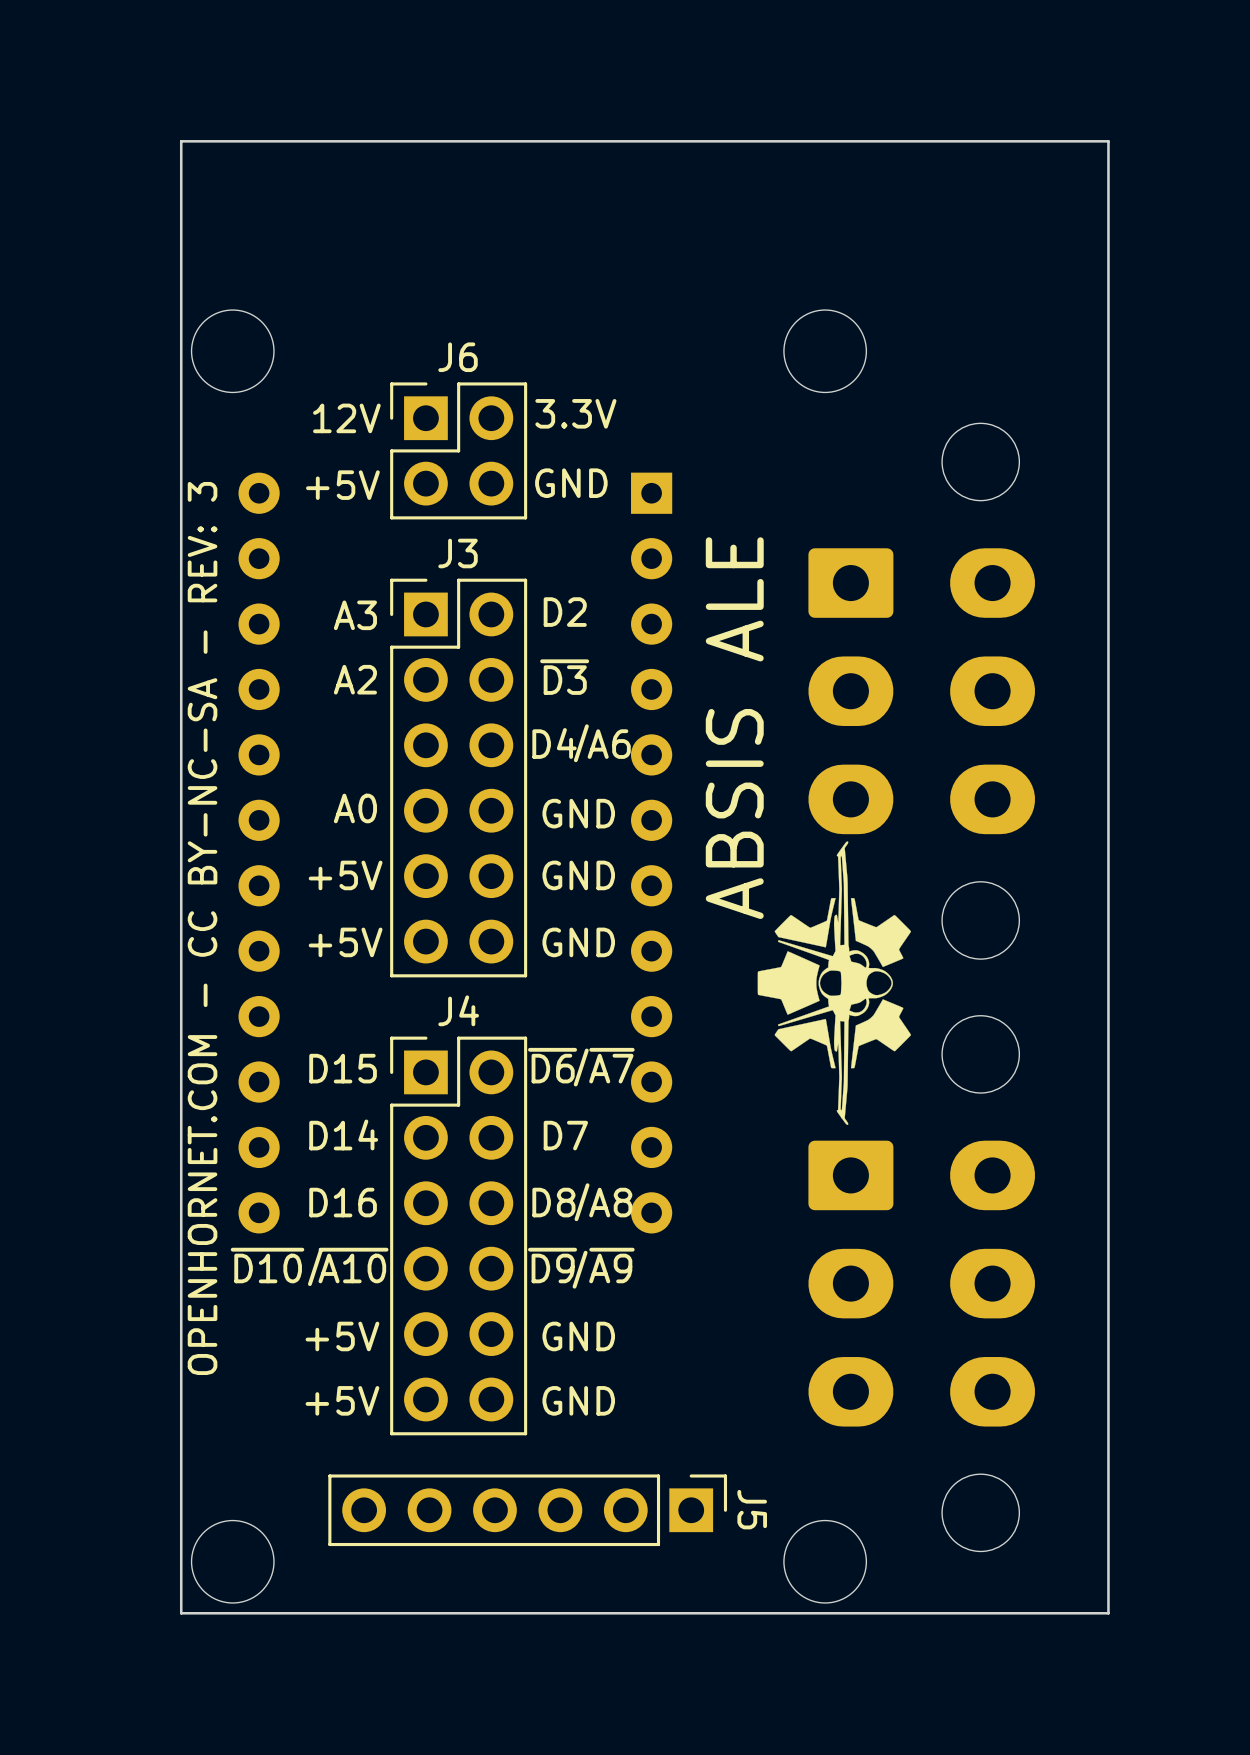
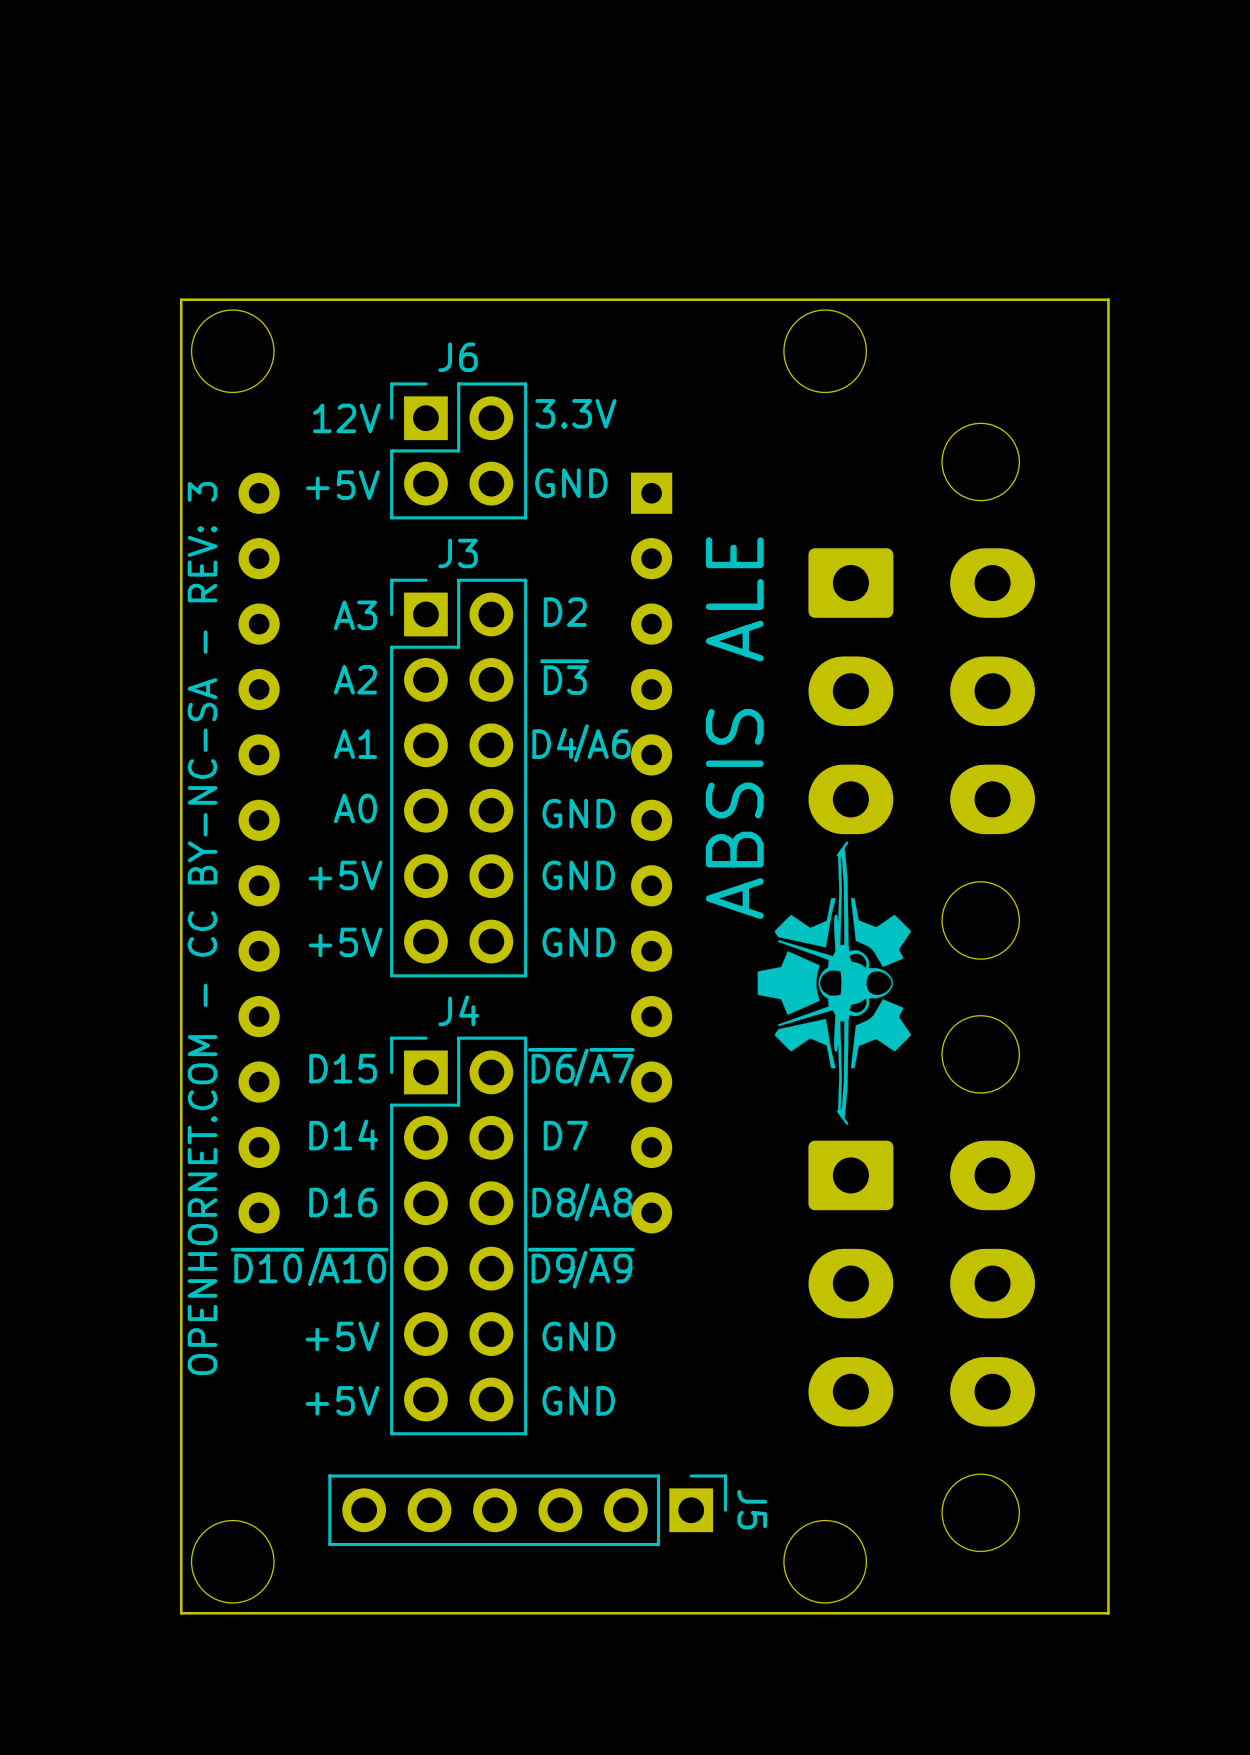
board edge: (1108, 299) (1108, 141) (181, 141) (181, 299) -> (1108, 299) (181, 299)
text: none -> A1 (355, 744)

